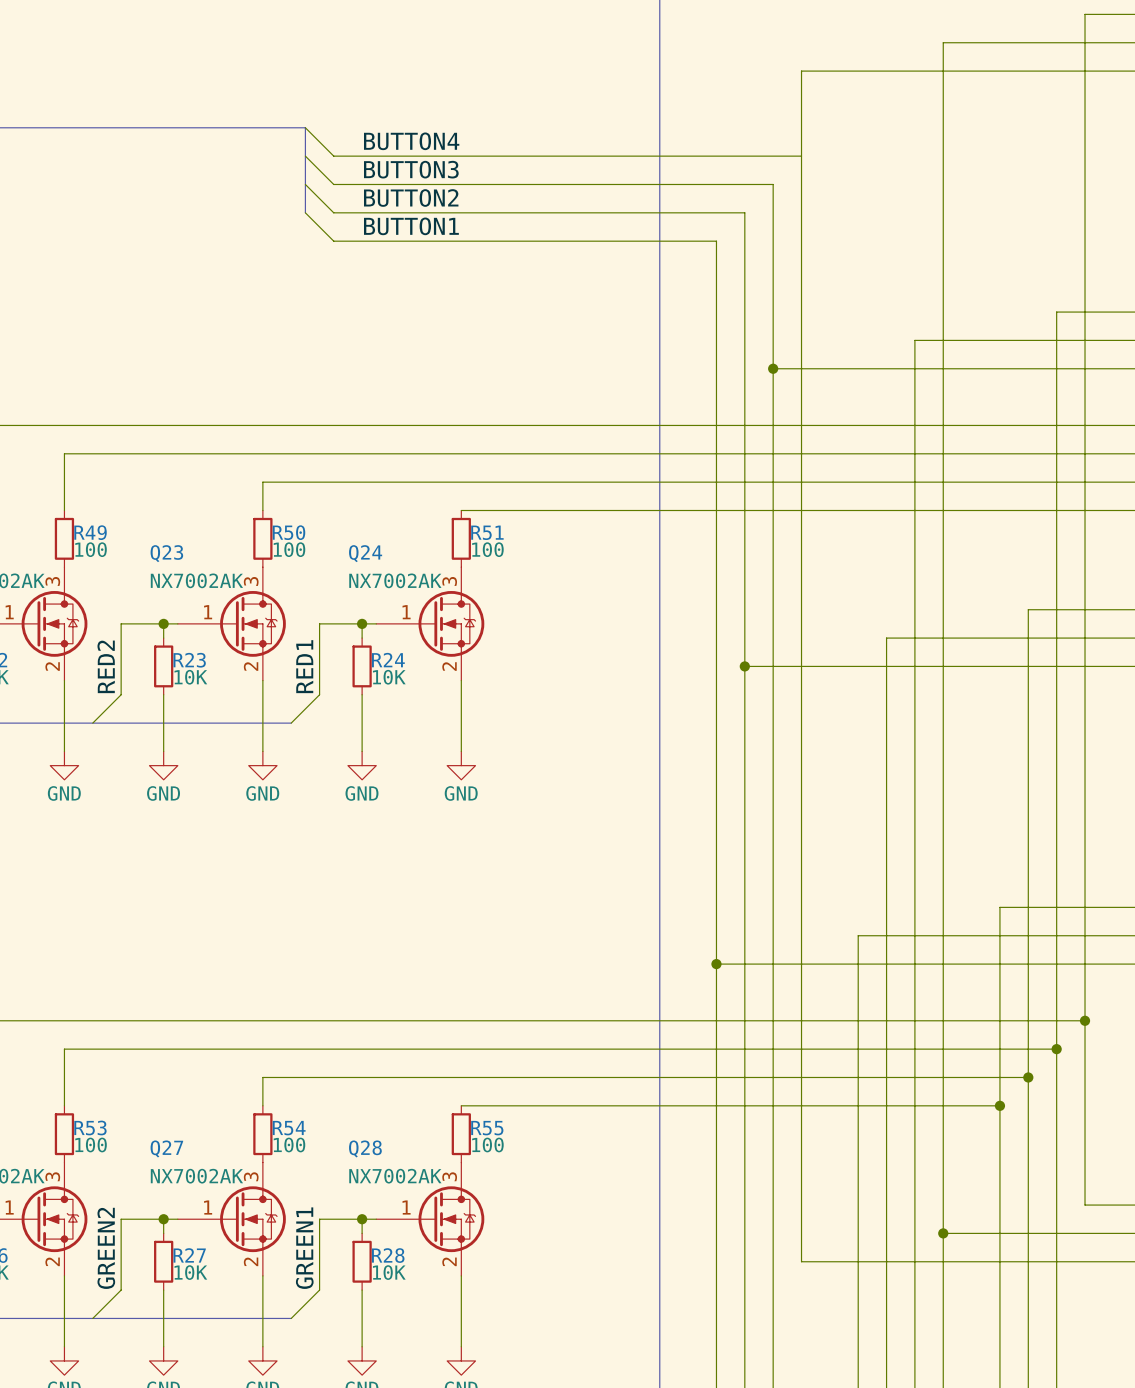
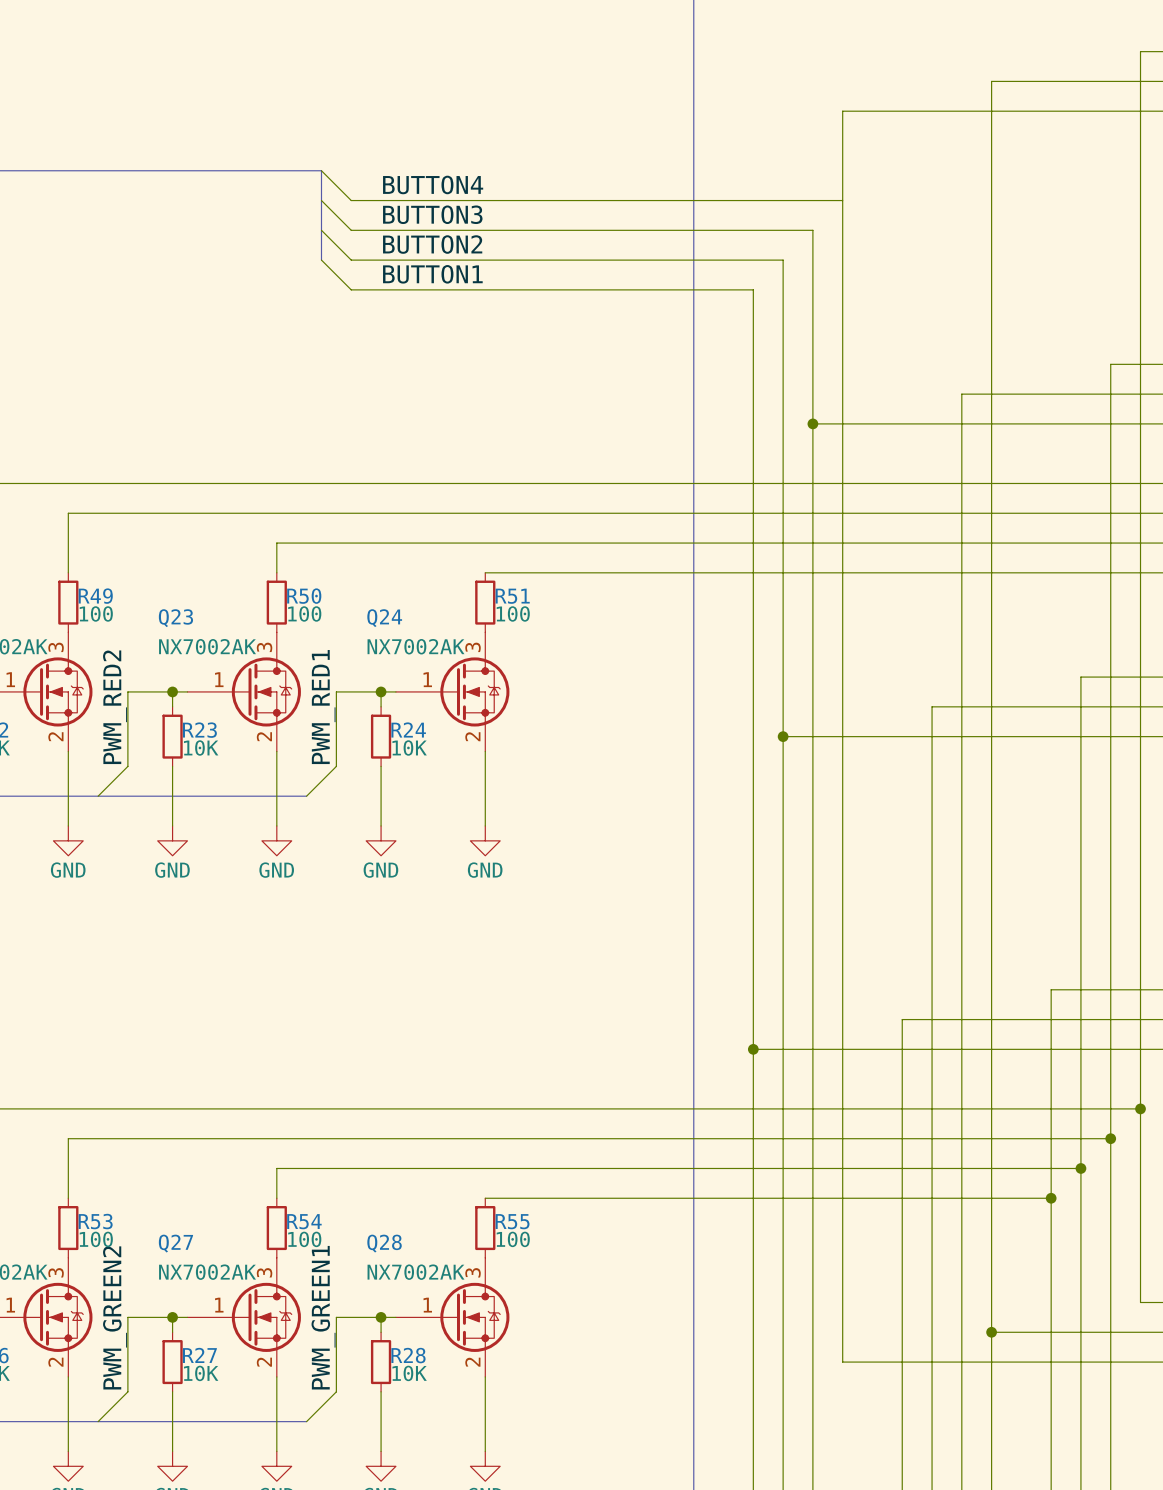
label: RED2 (106, 666) -> PWM_RED2 (115, 707)
label: RED1 (304, 666) -> PWM_RED1 (323, 707)
label: GREEN2 (106, 1248) -> PWM_GREEN2 (115, 1317)
label: GREEN1 (304, 1248) -> PWM_GREEN1 (323, 1317)

